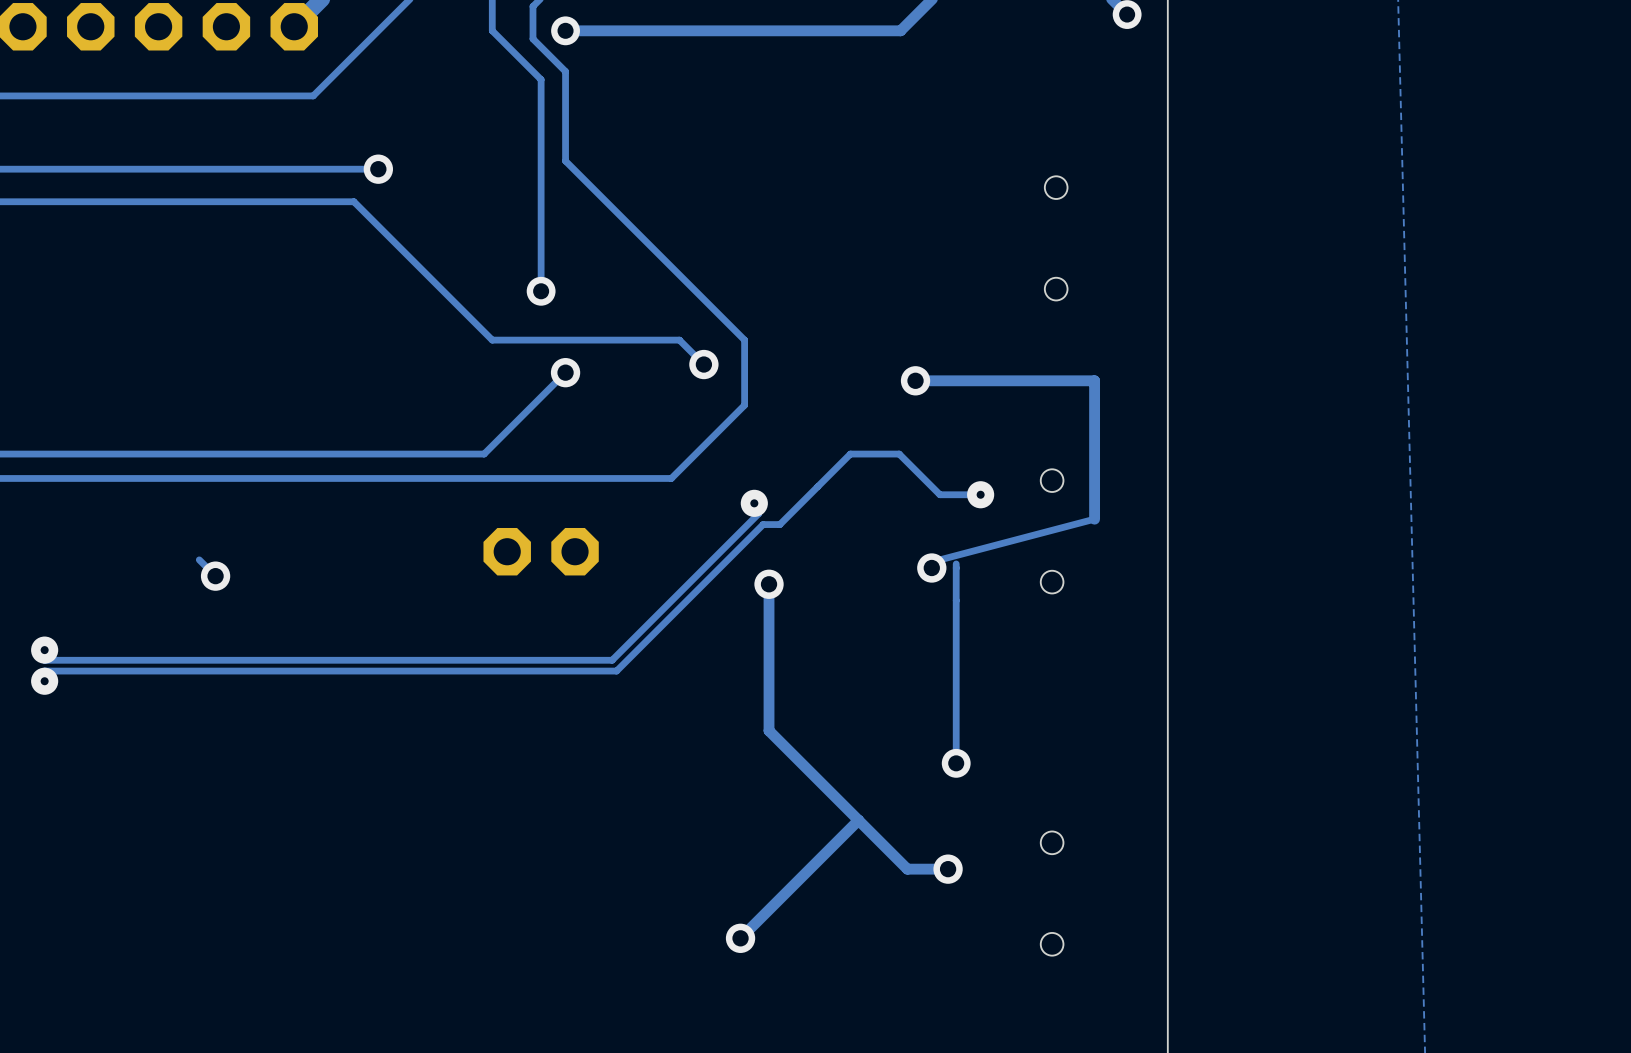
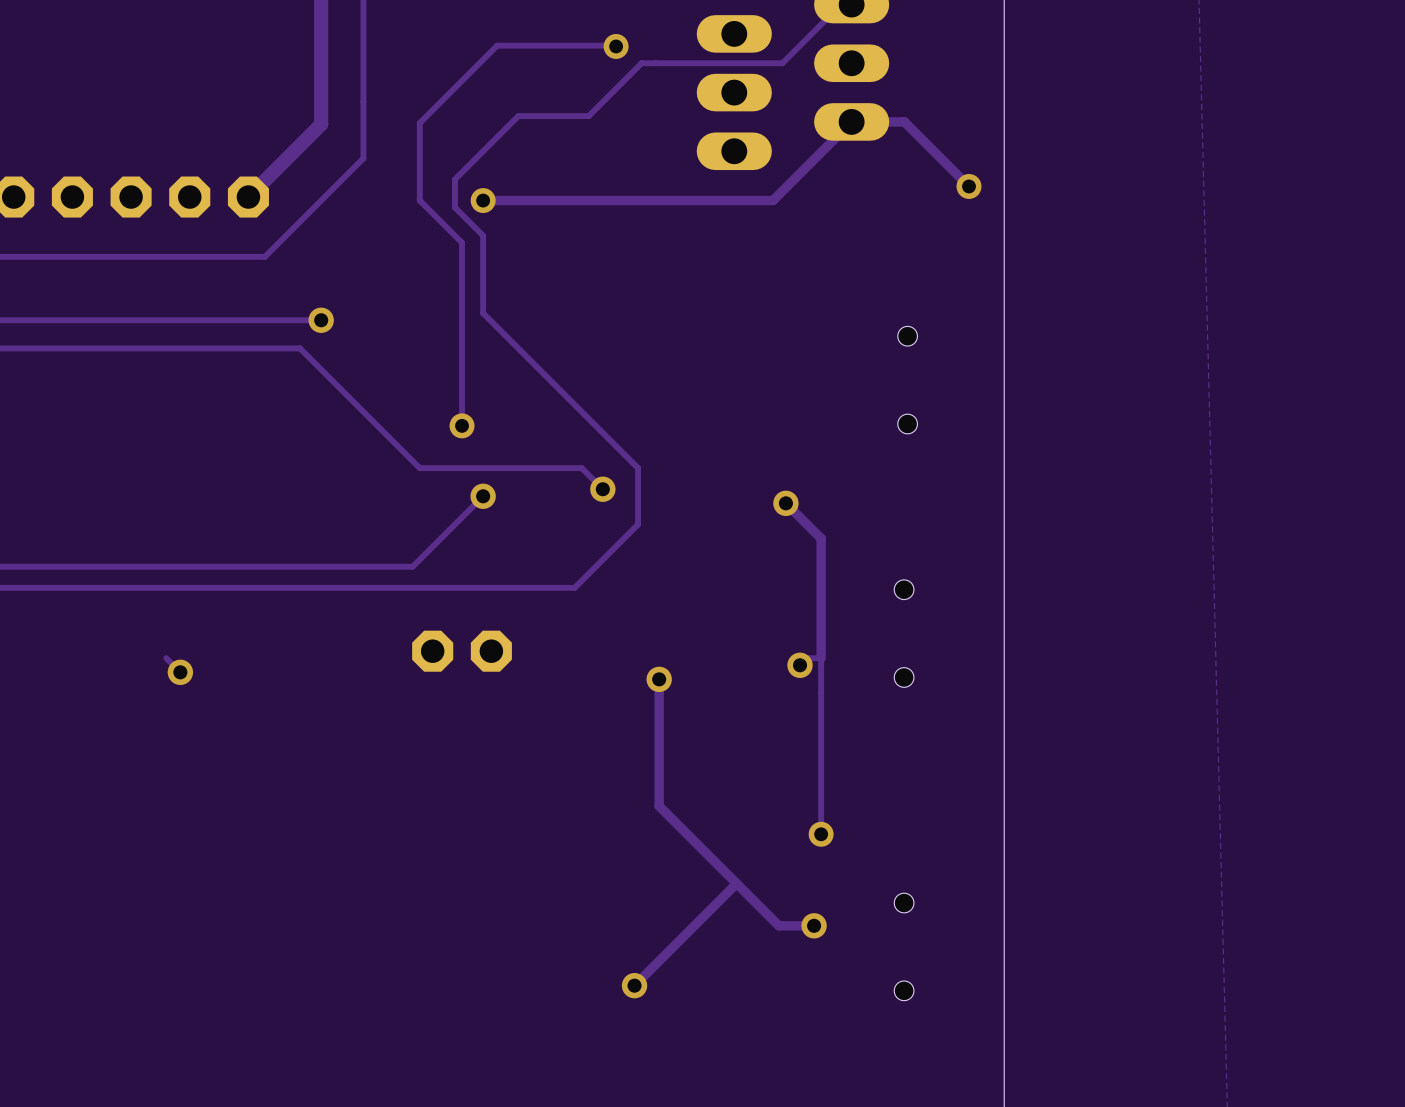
track: (915, 380) (1094, 380) (1094, 519) (939, 559) -> (785, 503) (821, 538) (821, 658) (807, 658)
track: (980, 494) (939, 494) (899, 454) (850, 454) (779, 524) (763, 524) (616, 671) (44, 671) (44, 681) -> none
via: (980, 494) -> none
track: (754, 503) (758, 513) (612, 660) (44, 660) (44, 650) -> none
via: (754, 503) -> none
via: (44, 650) -> none
via: (44, 681) -> none

